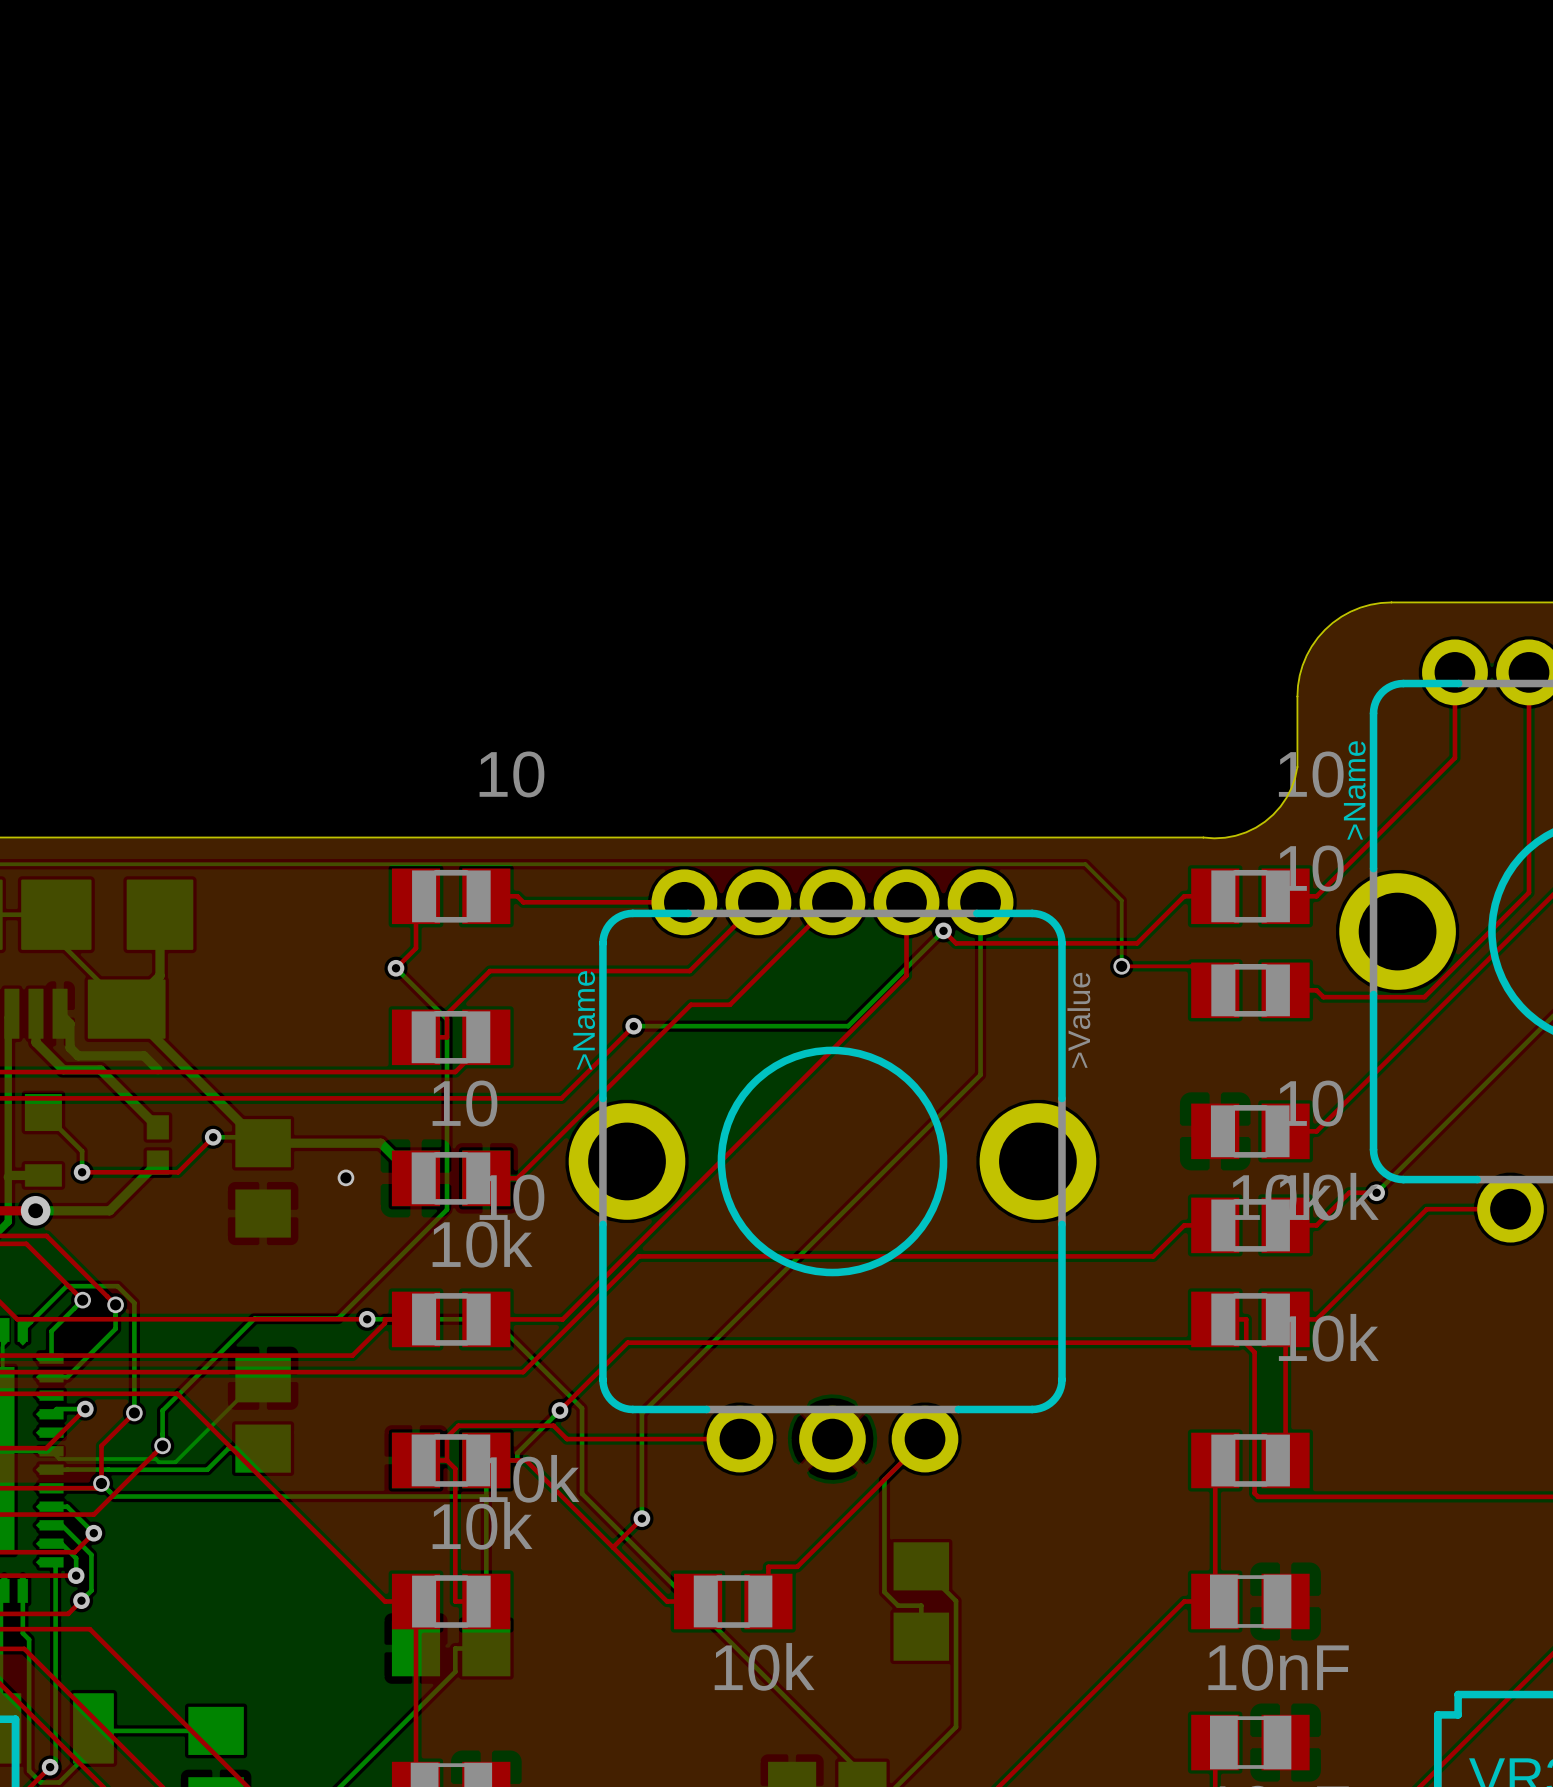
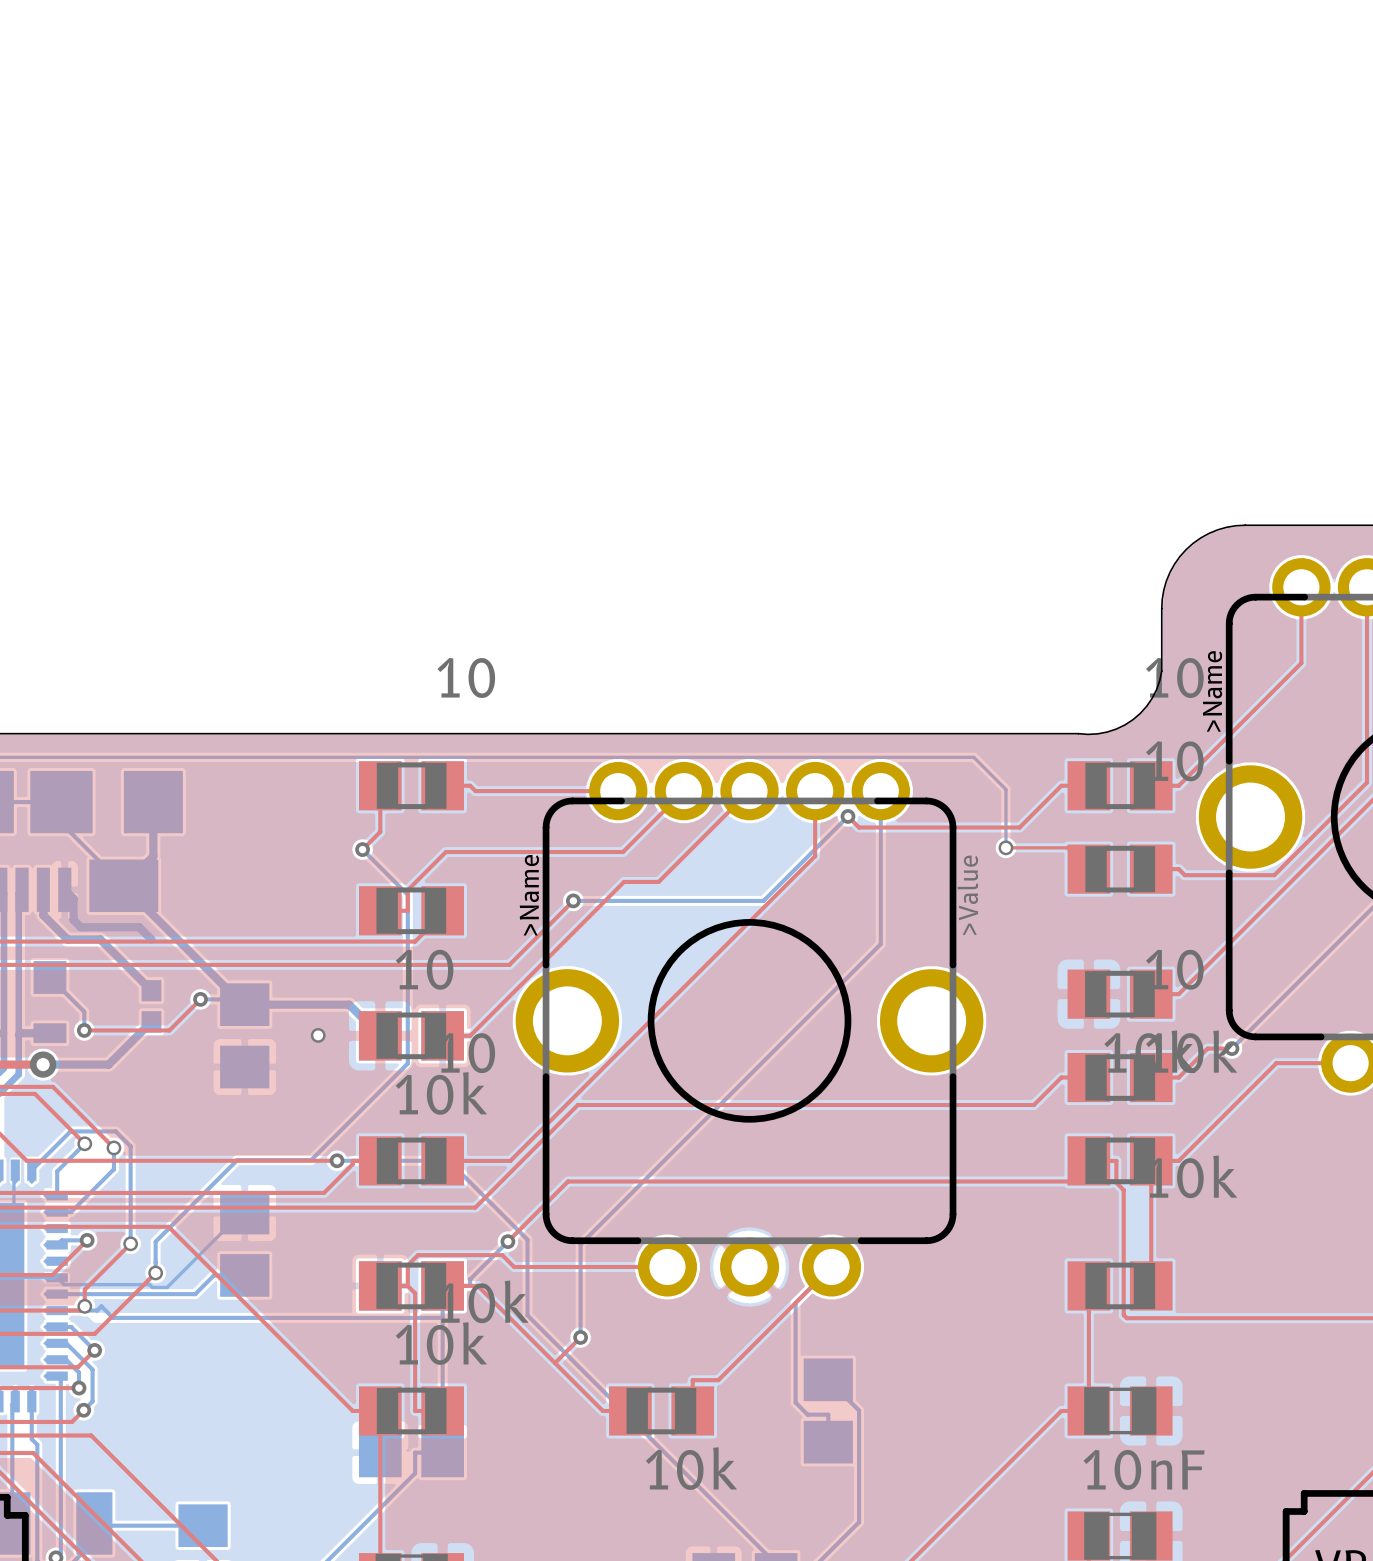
top track: (101, 1445) (101, 1483) (96, 1488) (77, 1488) -> (101, 1273) (84, 1289) (84, 1306) (80, 1310)
via position: (101, 1483) -> (84, 1306)

